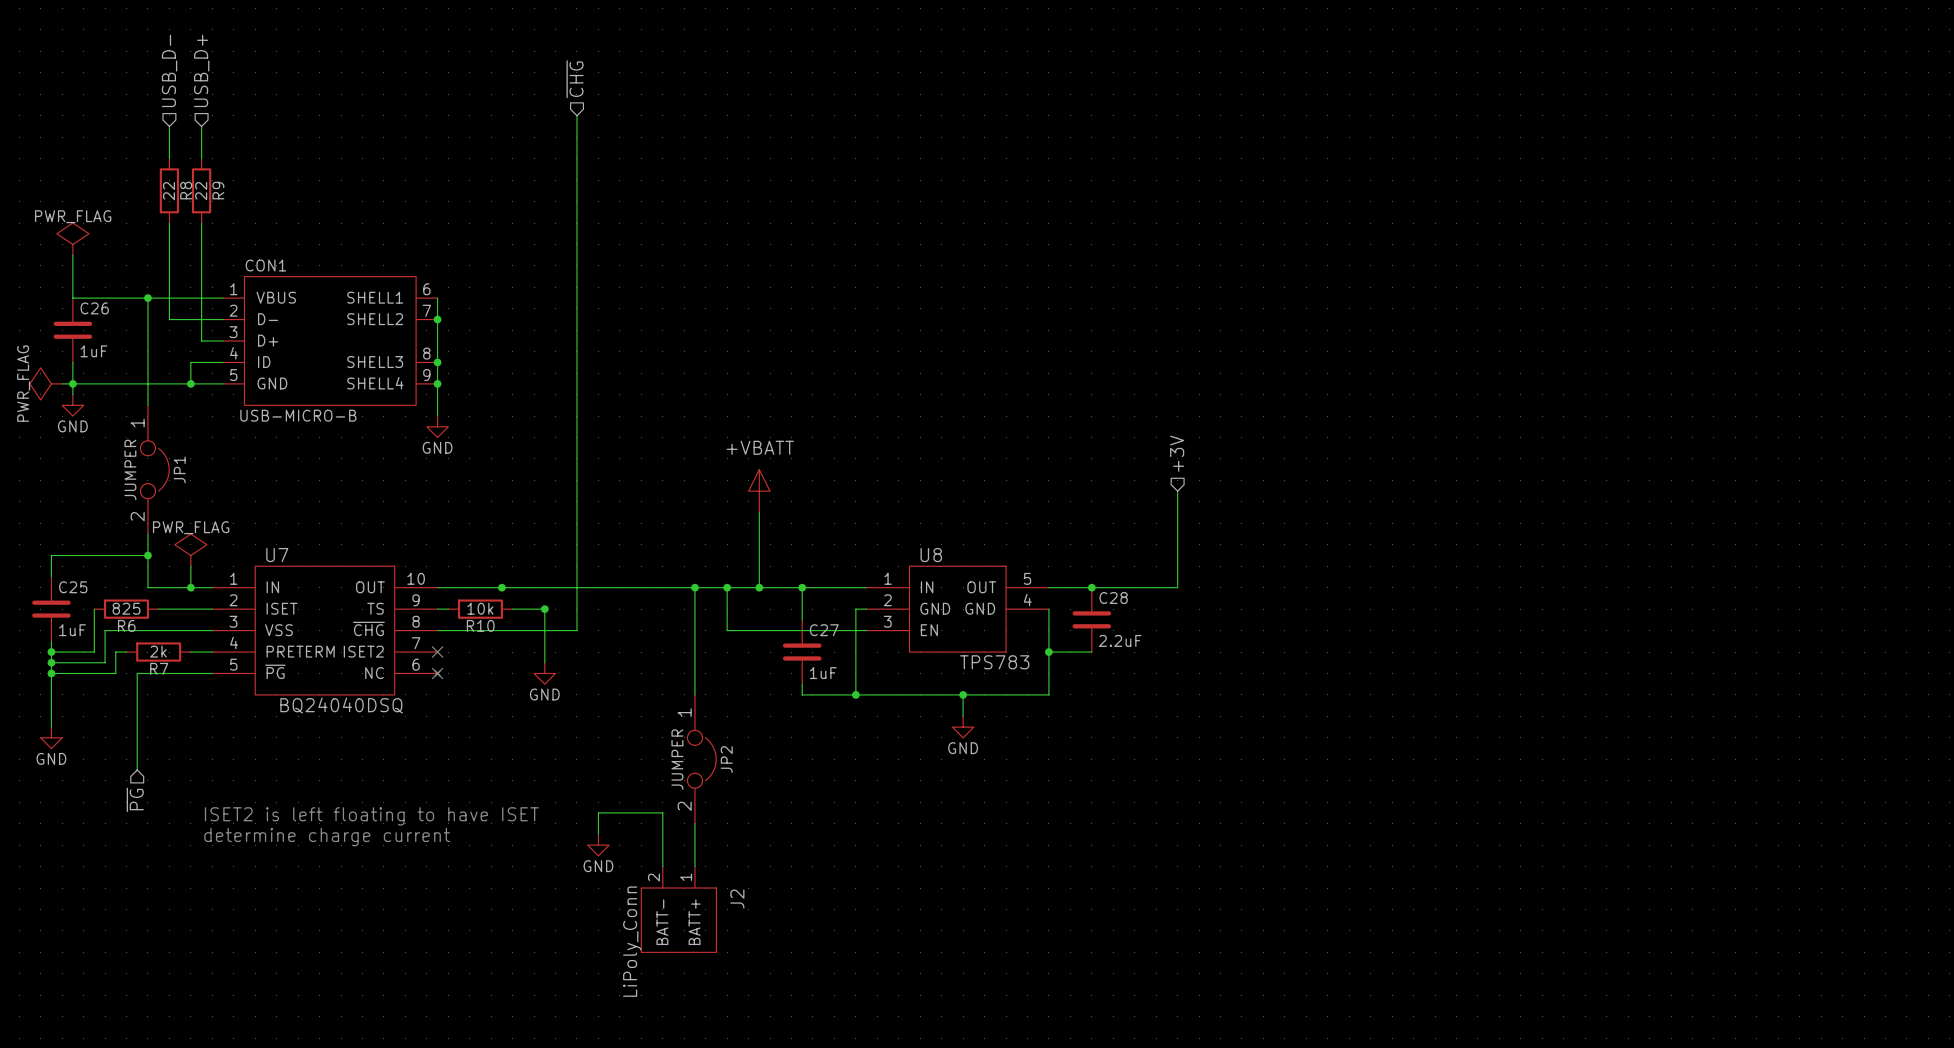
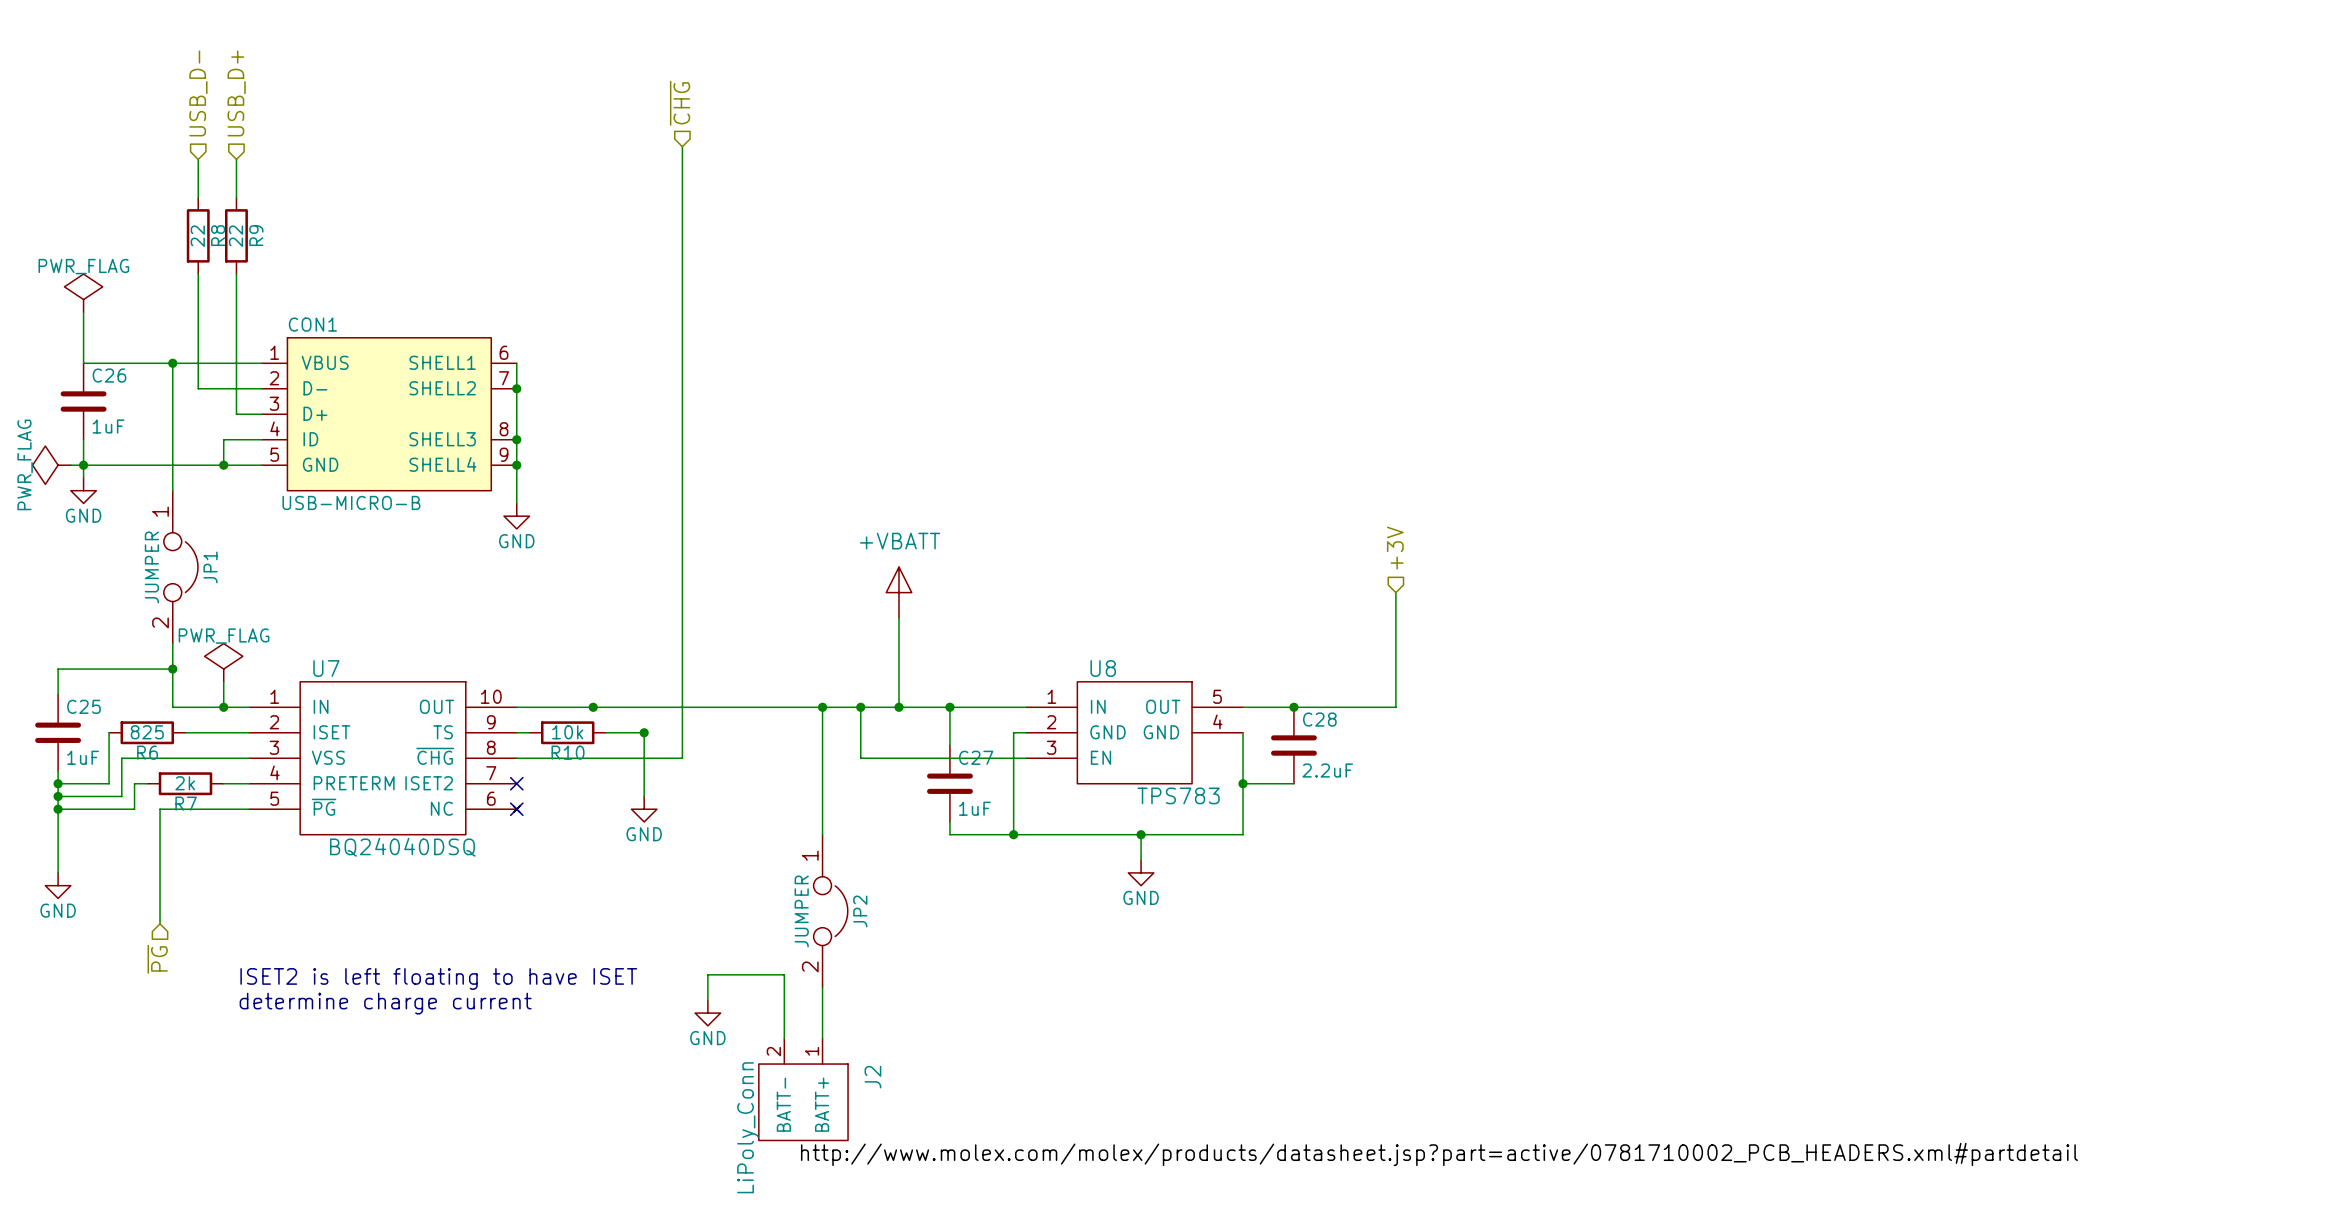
label: none -> http://www.molex.com/molex/products/datasheet.jsp?part=active/0781710002_PCB_HEADERS.xml#partdetail (1439, 1154)

